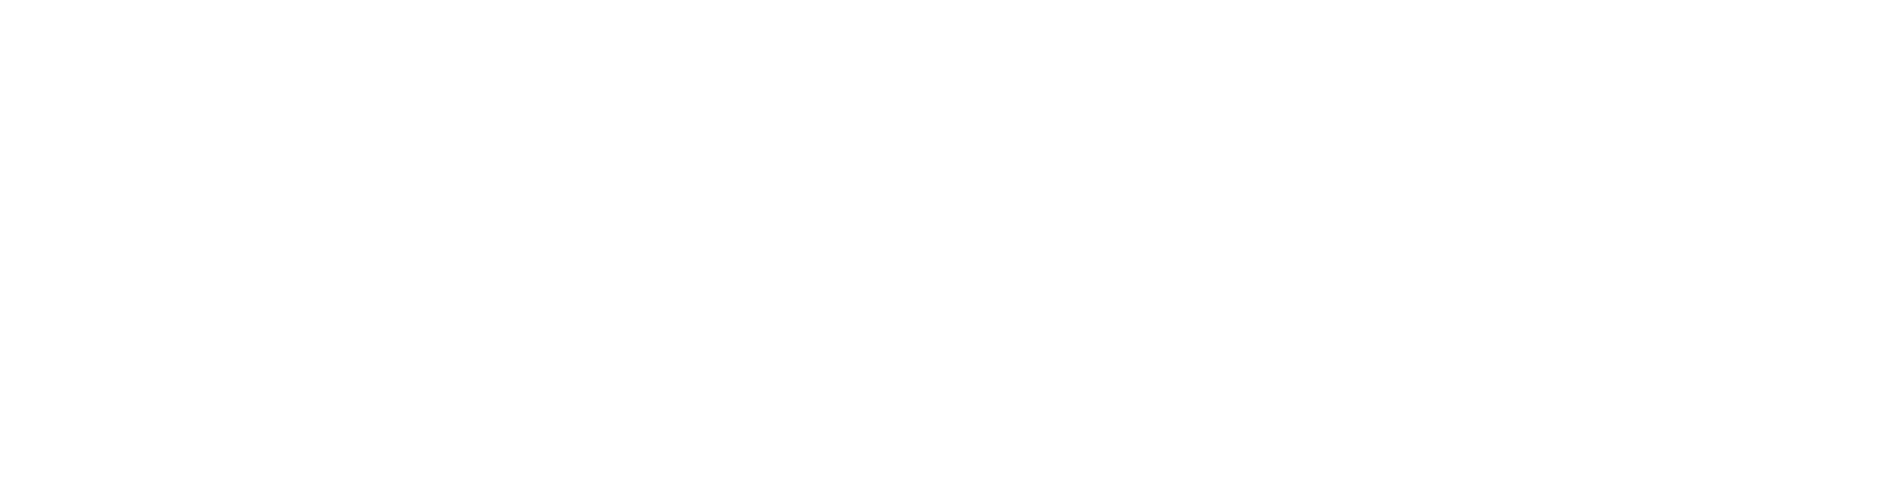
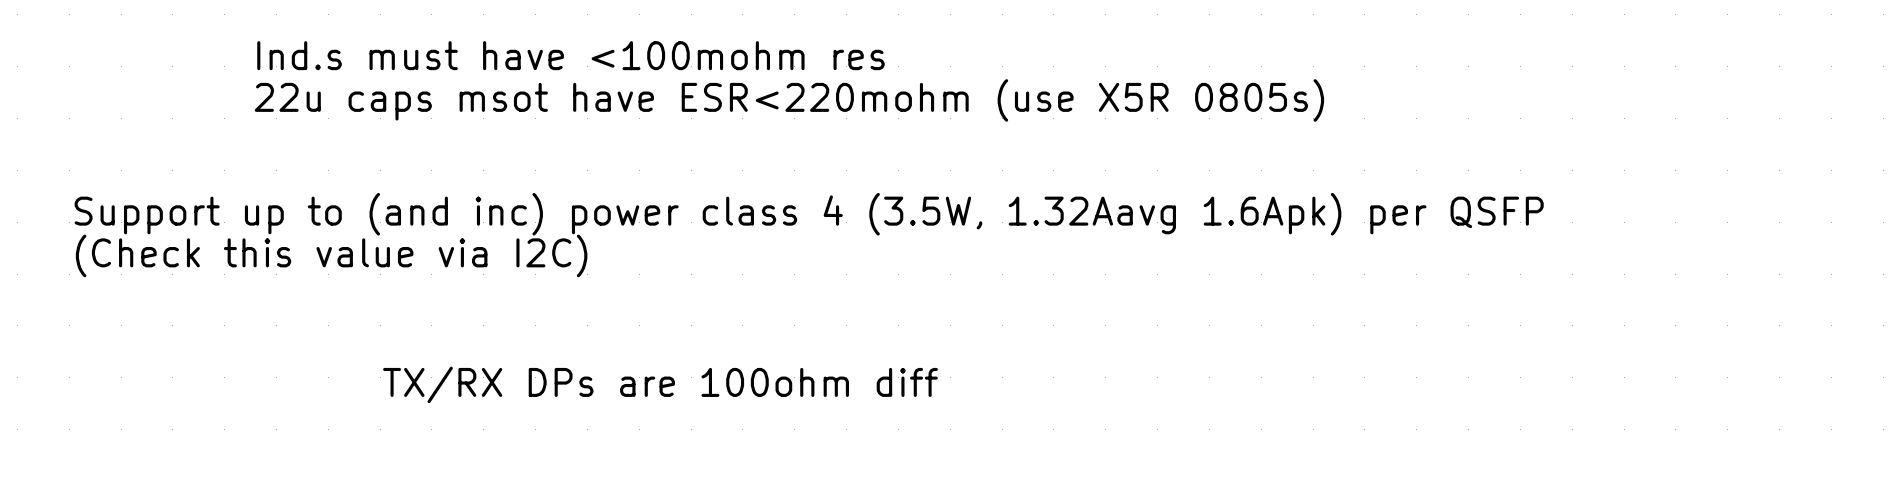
text: none -> Ind.s must have <100mohm res (571, 55)
text: none -> 22u caps msot have ESR<220mohm (use X5R 0805s) (789, 100)
text: none -> Support up to (and inc) power class 4 (3.5W, 1.32Aavg 1.6Apk) per QSFP (809, 214)
text: none -> (Check this value via I2C) (331, 255)
text: none -> TX/RX DPs are 100ohm diff (660, 384)

